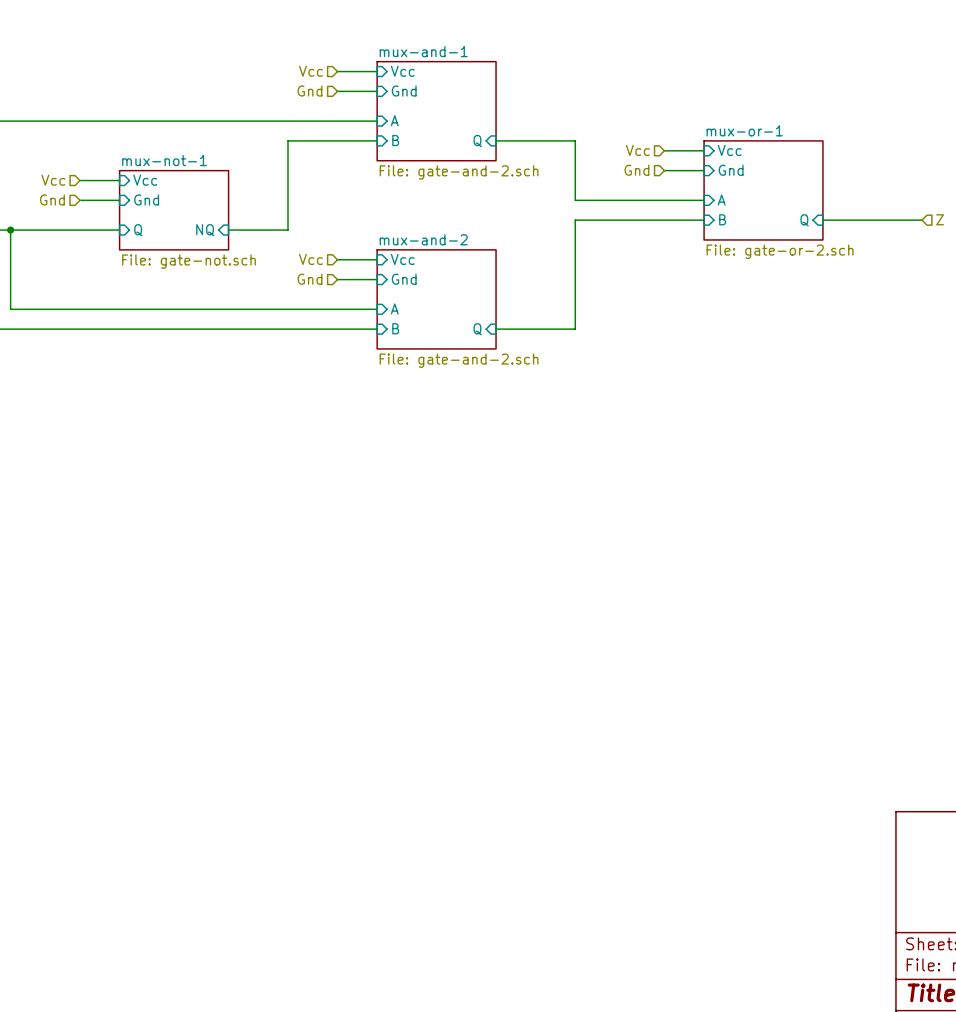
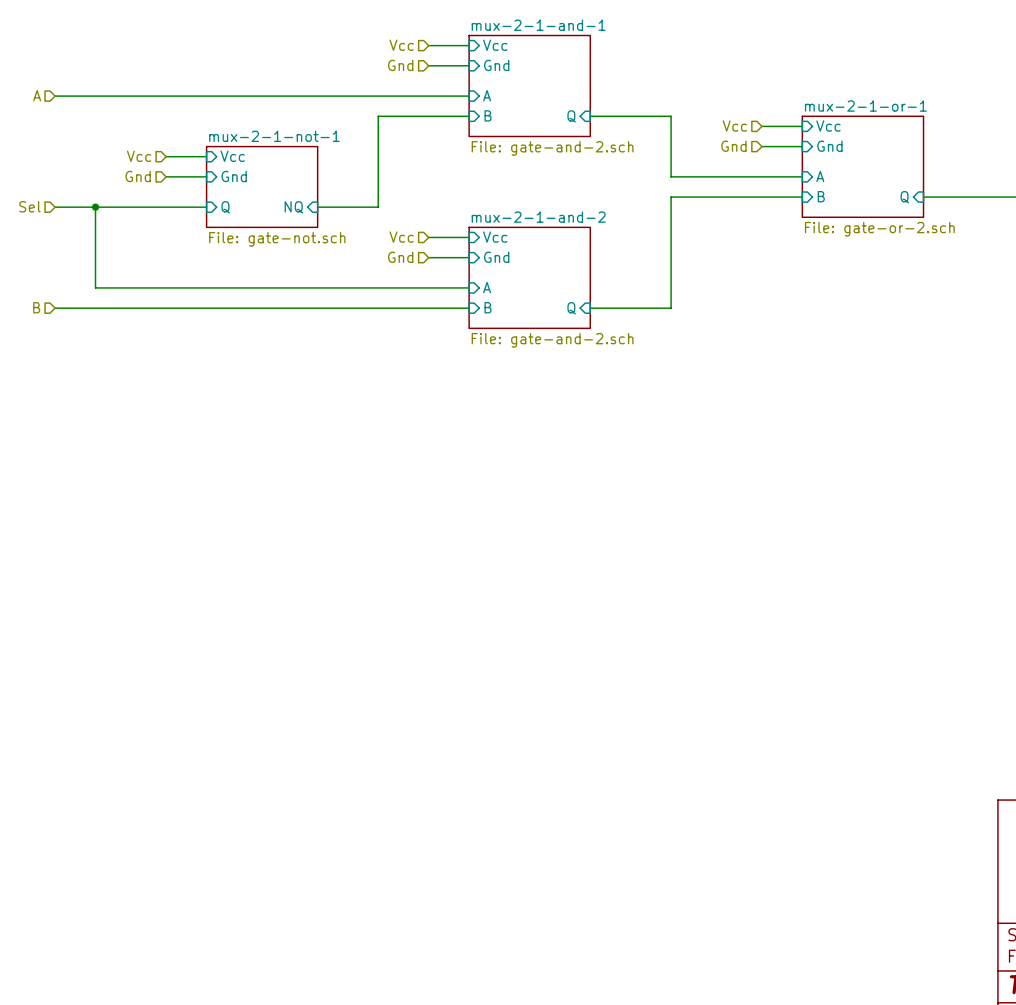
sheet mux-and-1 name: mux-and-1 (423, 51) -> mux-2-1-and-1 (538, 25)
sheet mux-or-1 name: mux-or-1 (744, 130) -> mux-2-1-or-1 (865, 106)
sheet mux-not-1 name: mux-not-1 (164, 160) -> mux-2-1-not-1 (274, 136)
sheet mux-and-2 name: mux-and-2 (423, 239) -> mux-2-1-and-2 (538, 217)

